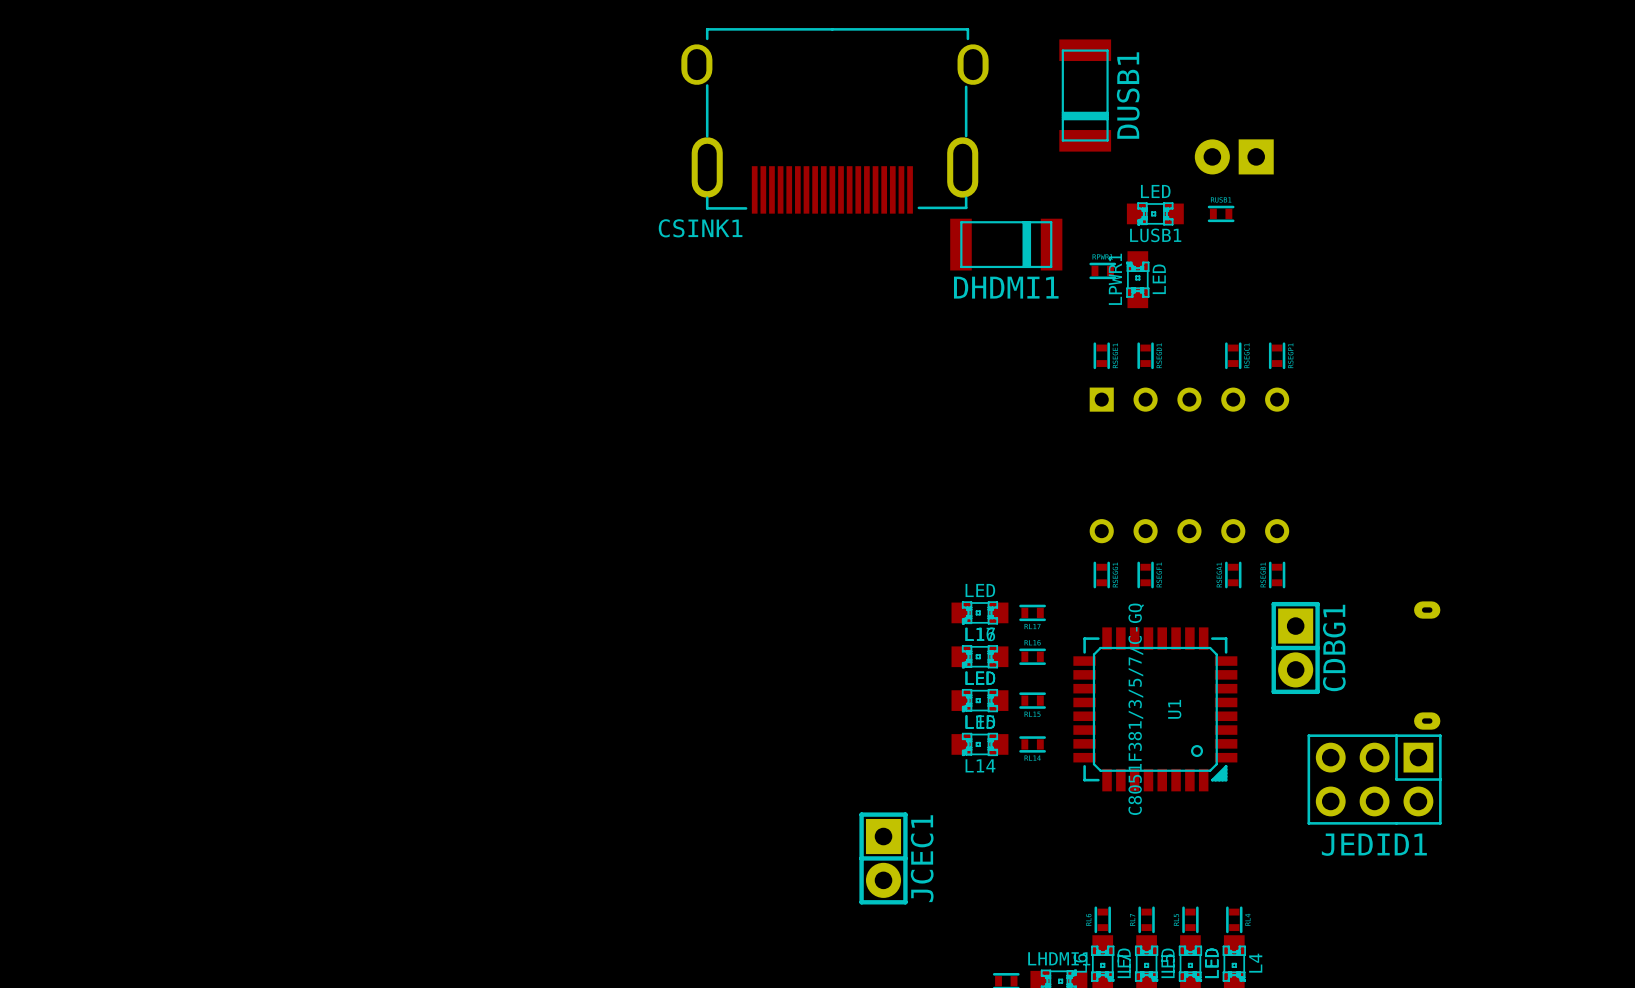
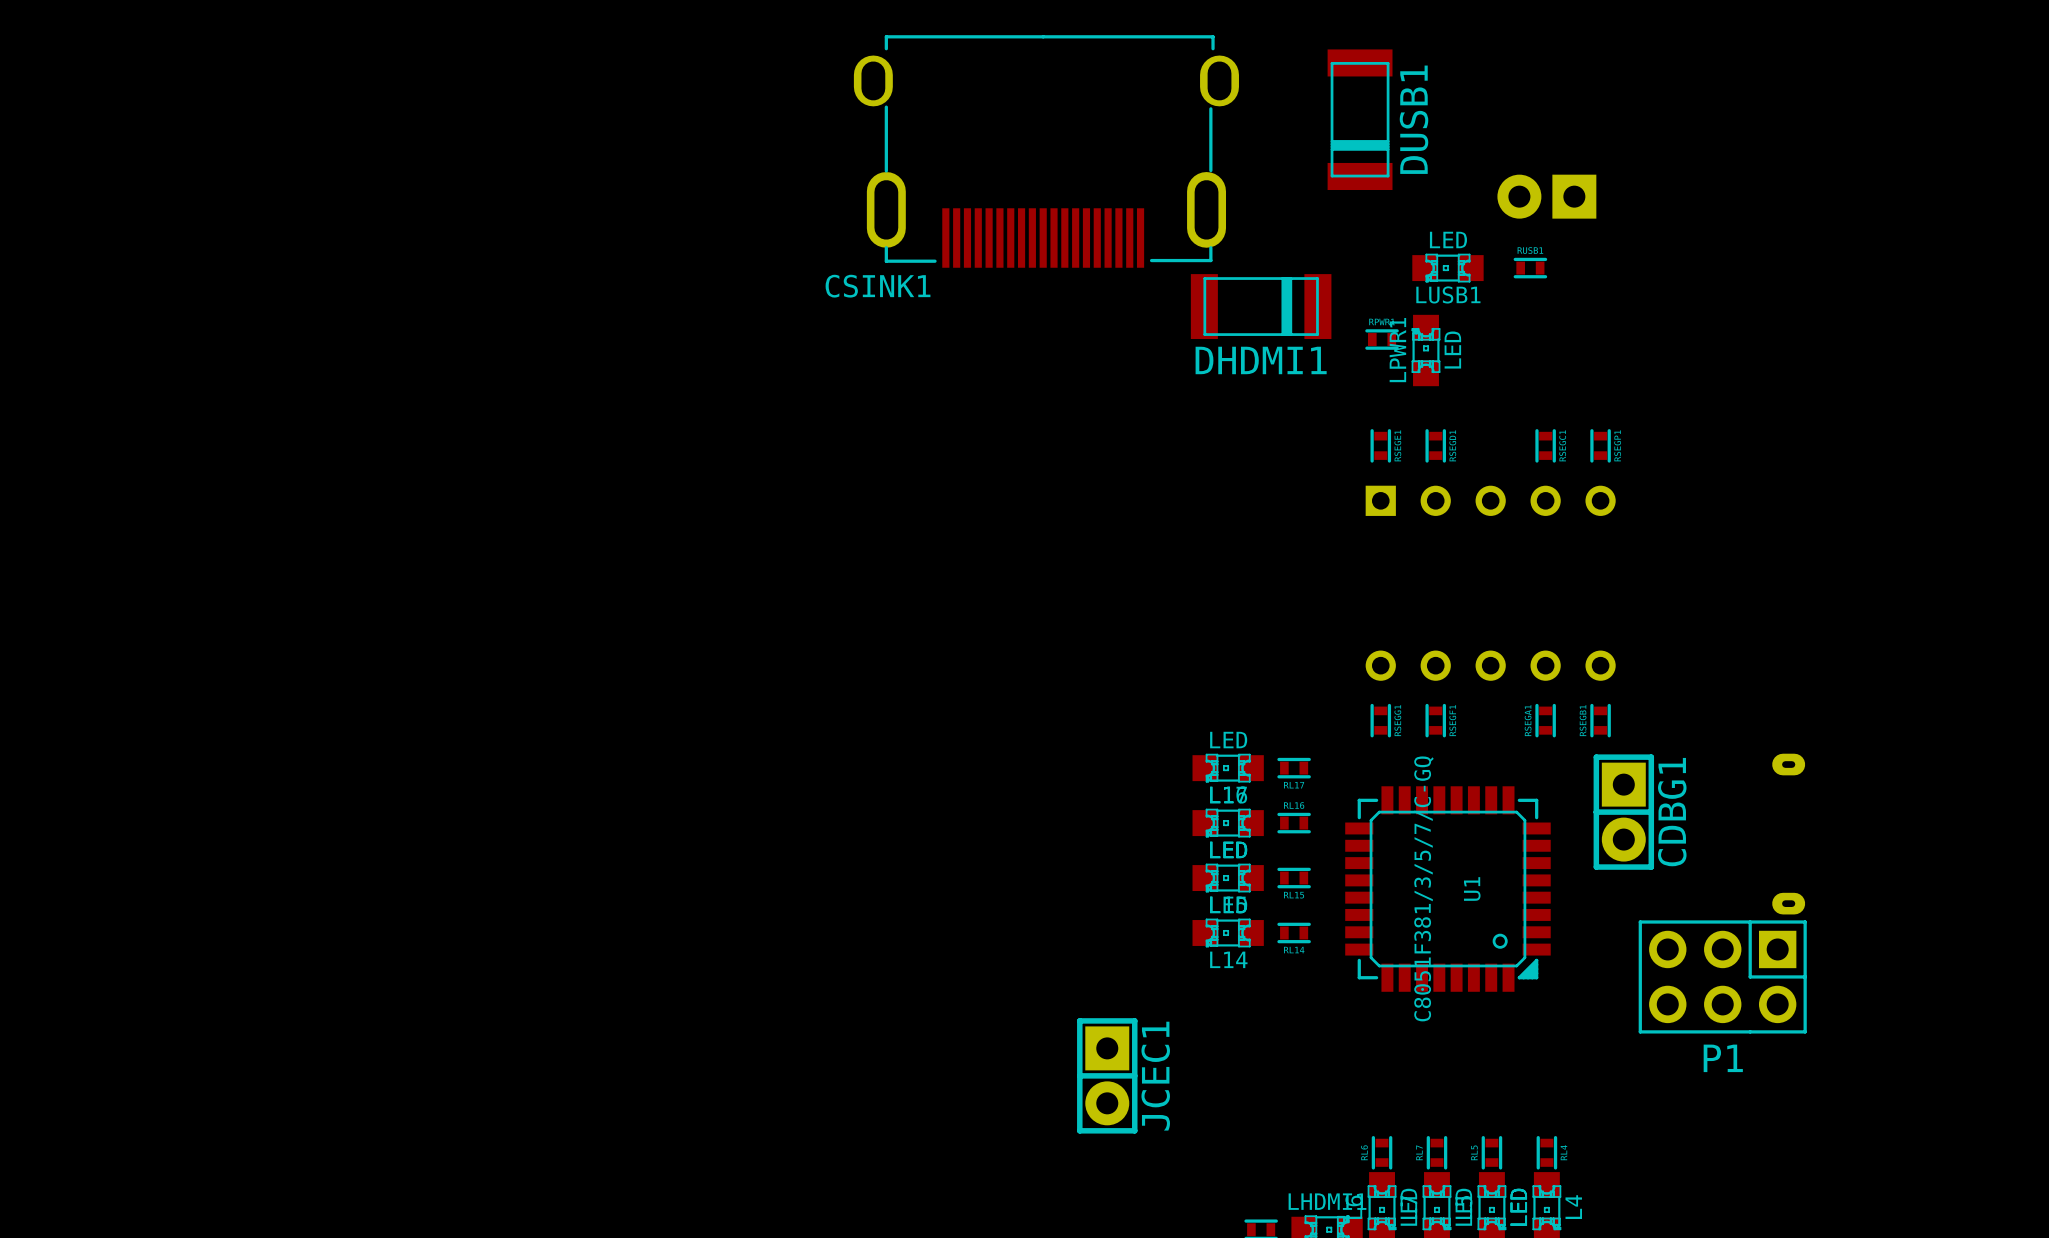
JEDID1 name: JEDID1 (1374, 844) -> P1 (1723, 1058)

